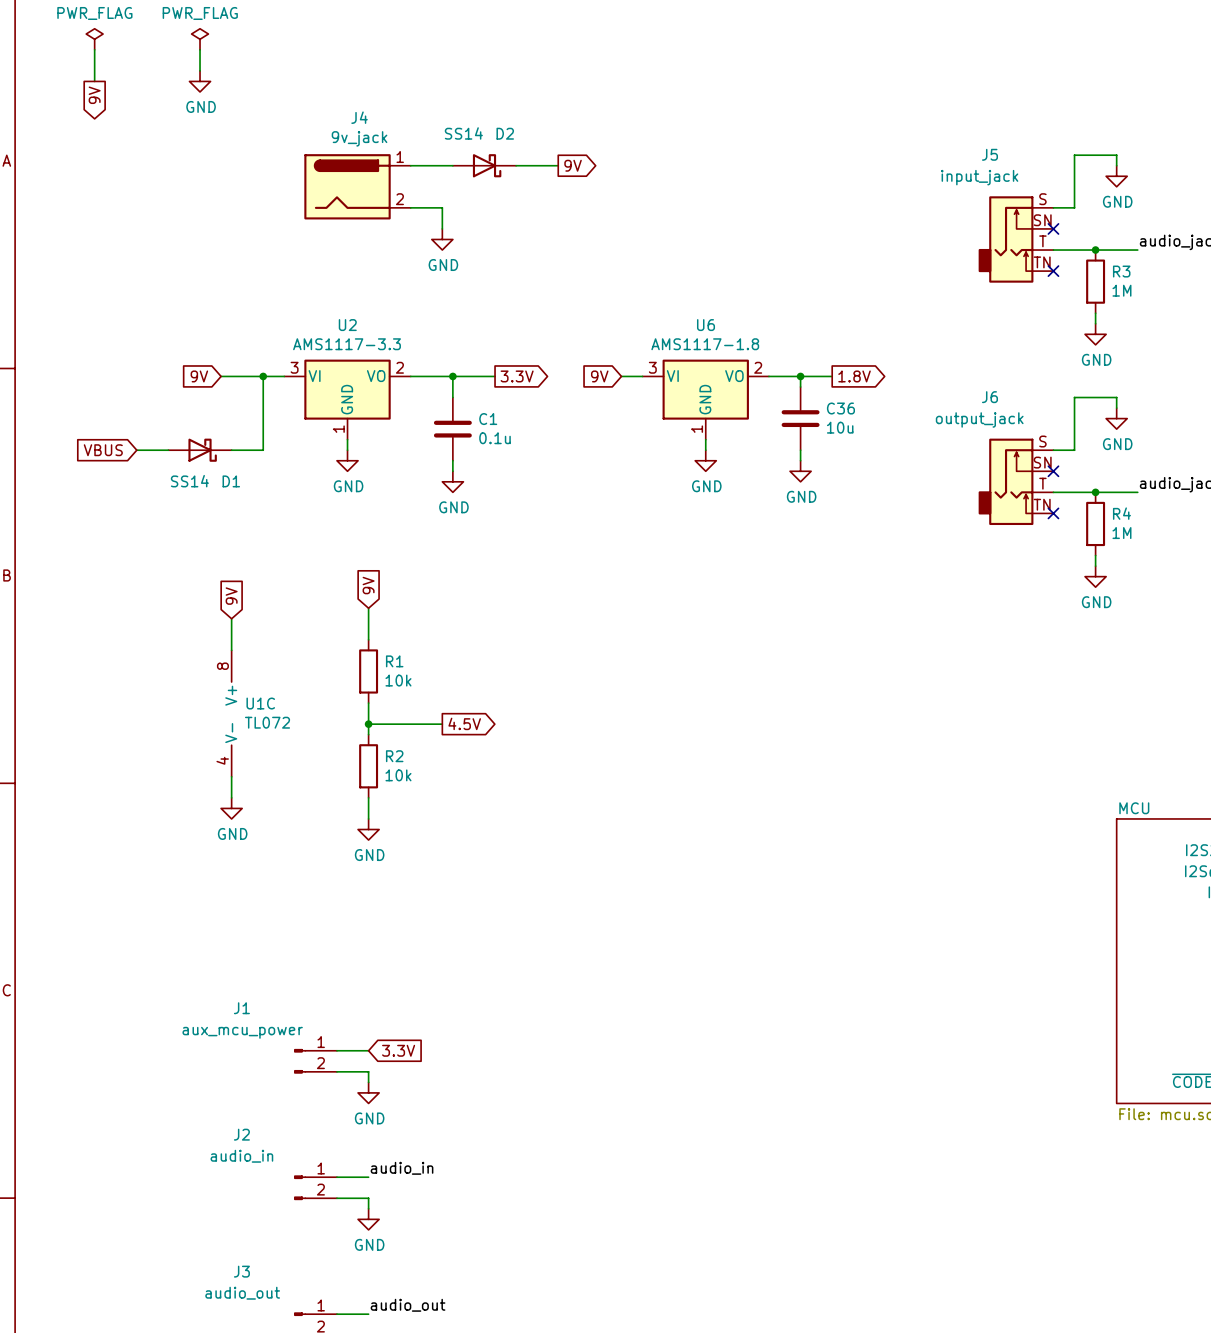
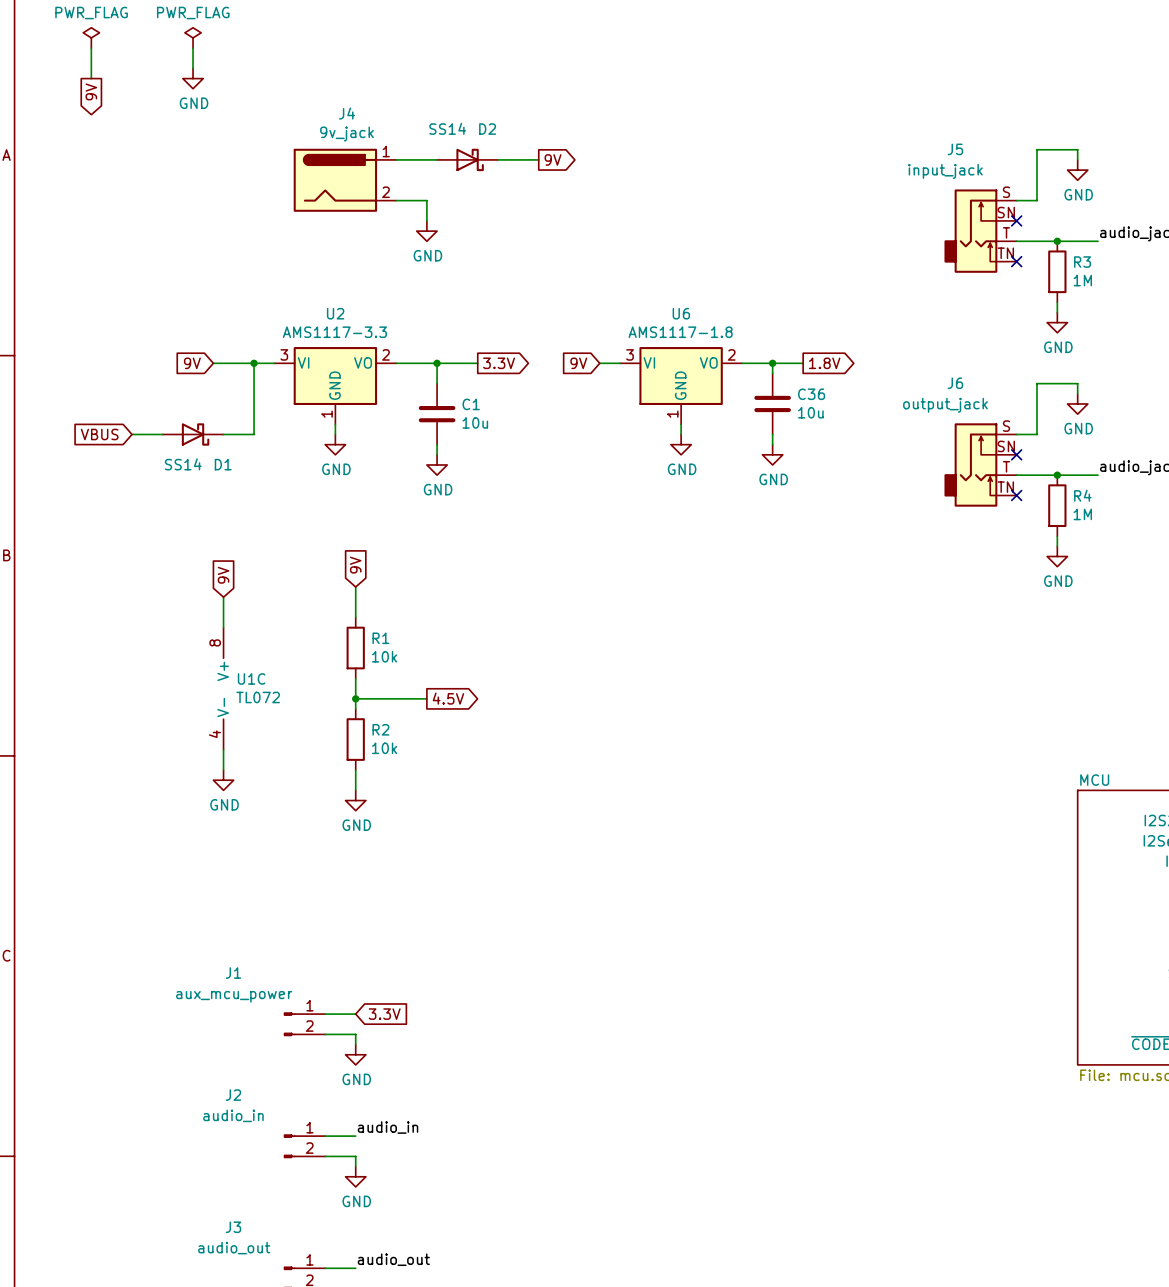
C1 value: 0.1u (495, 438) -> 10u (475, 422)

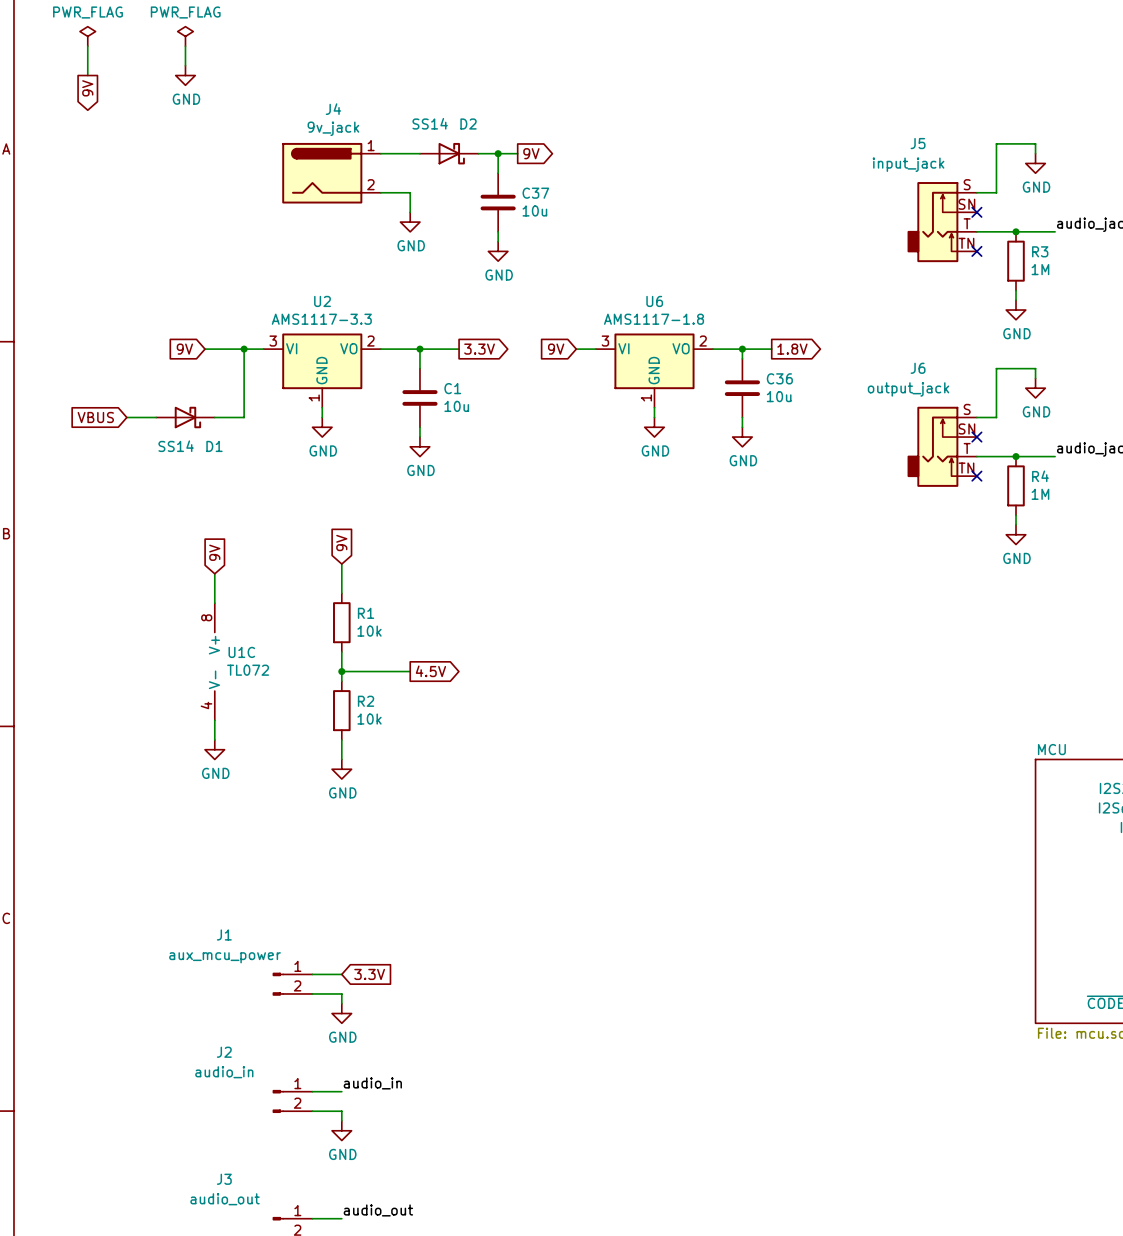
wire: none -> (498, 153) (498, 173)
junction: none -> (498, 153)
C37: none -> 10u (498, 202)
wire: none -> (498, 231) (498, 241)
power symbol: none -> GND (498, 251)

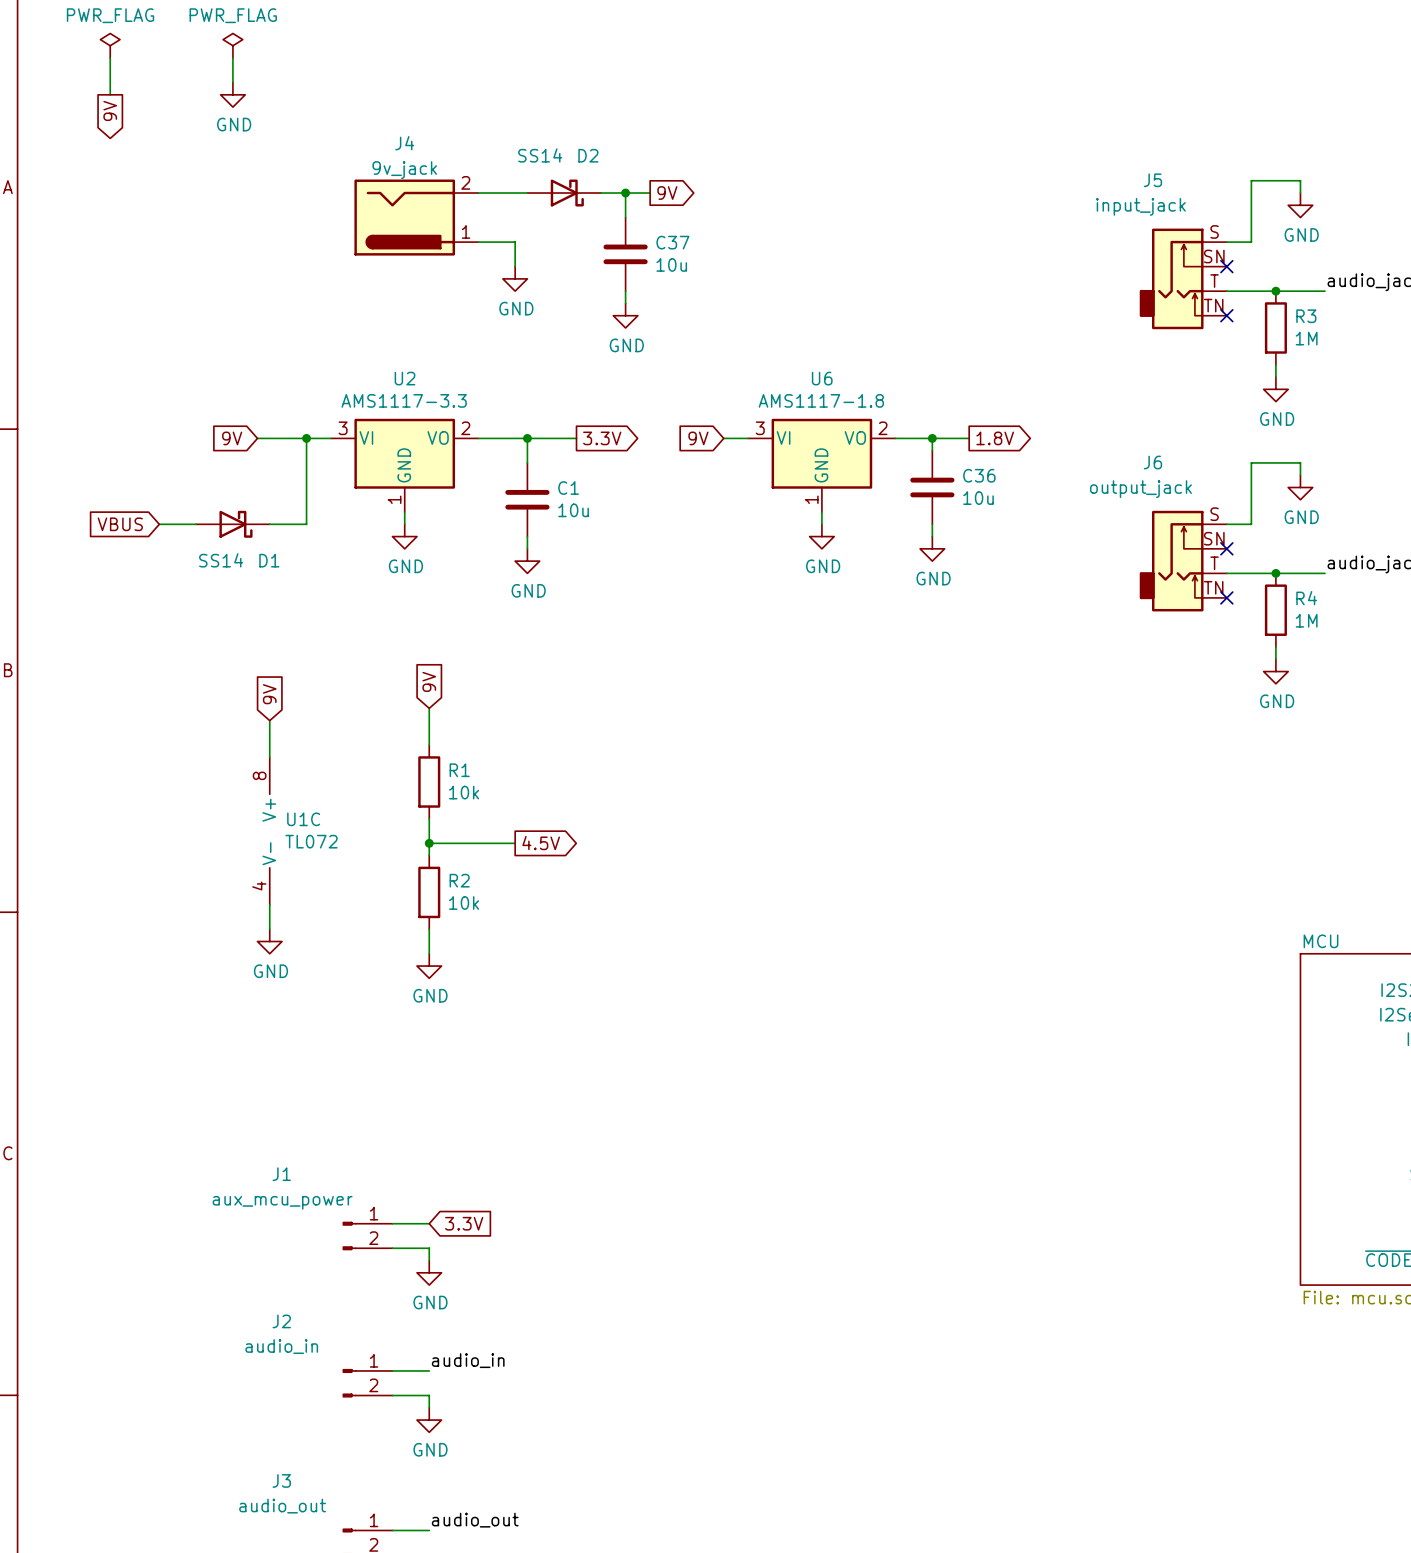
J4 flip: as is (322, 173) -> up-down (404, 217)

